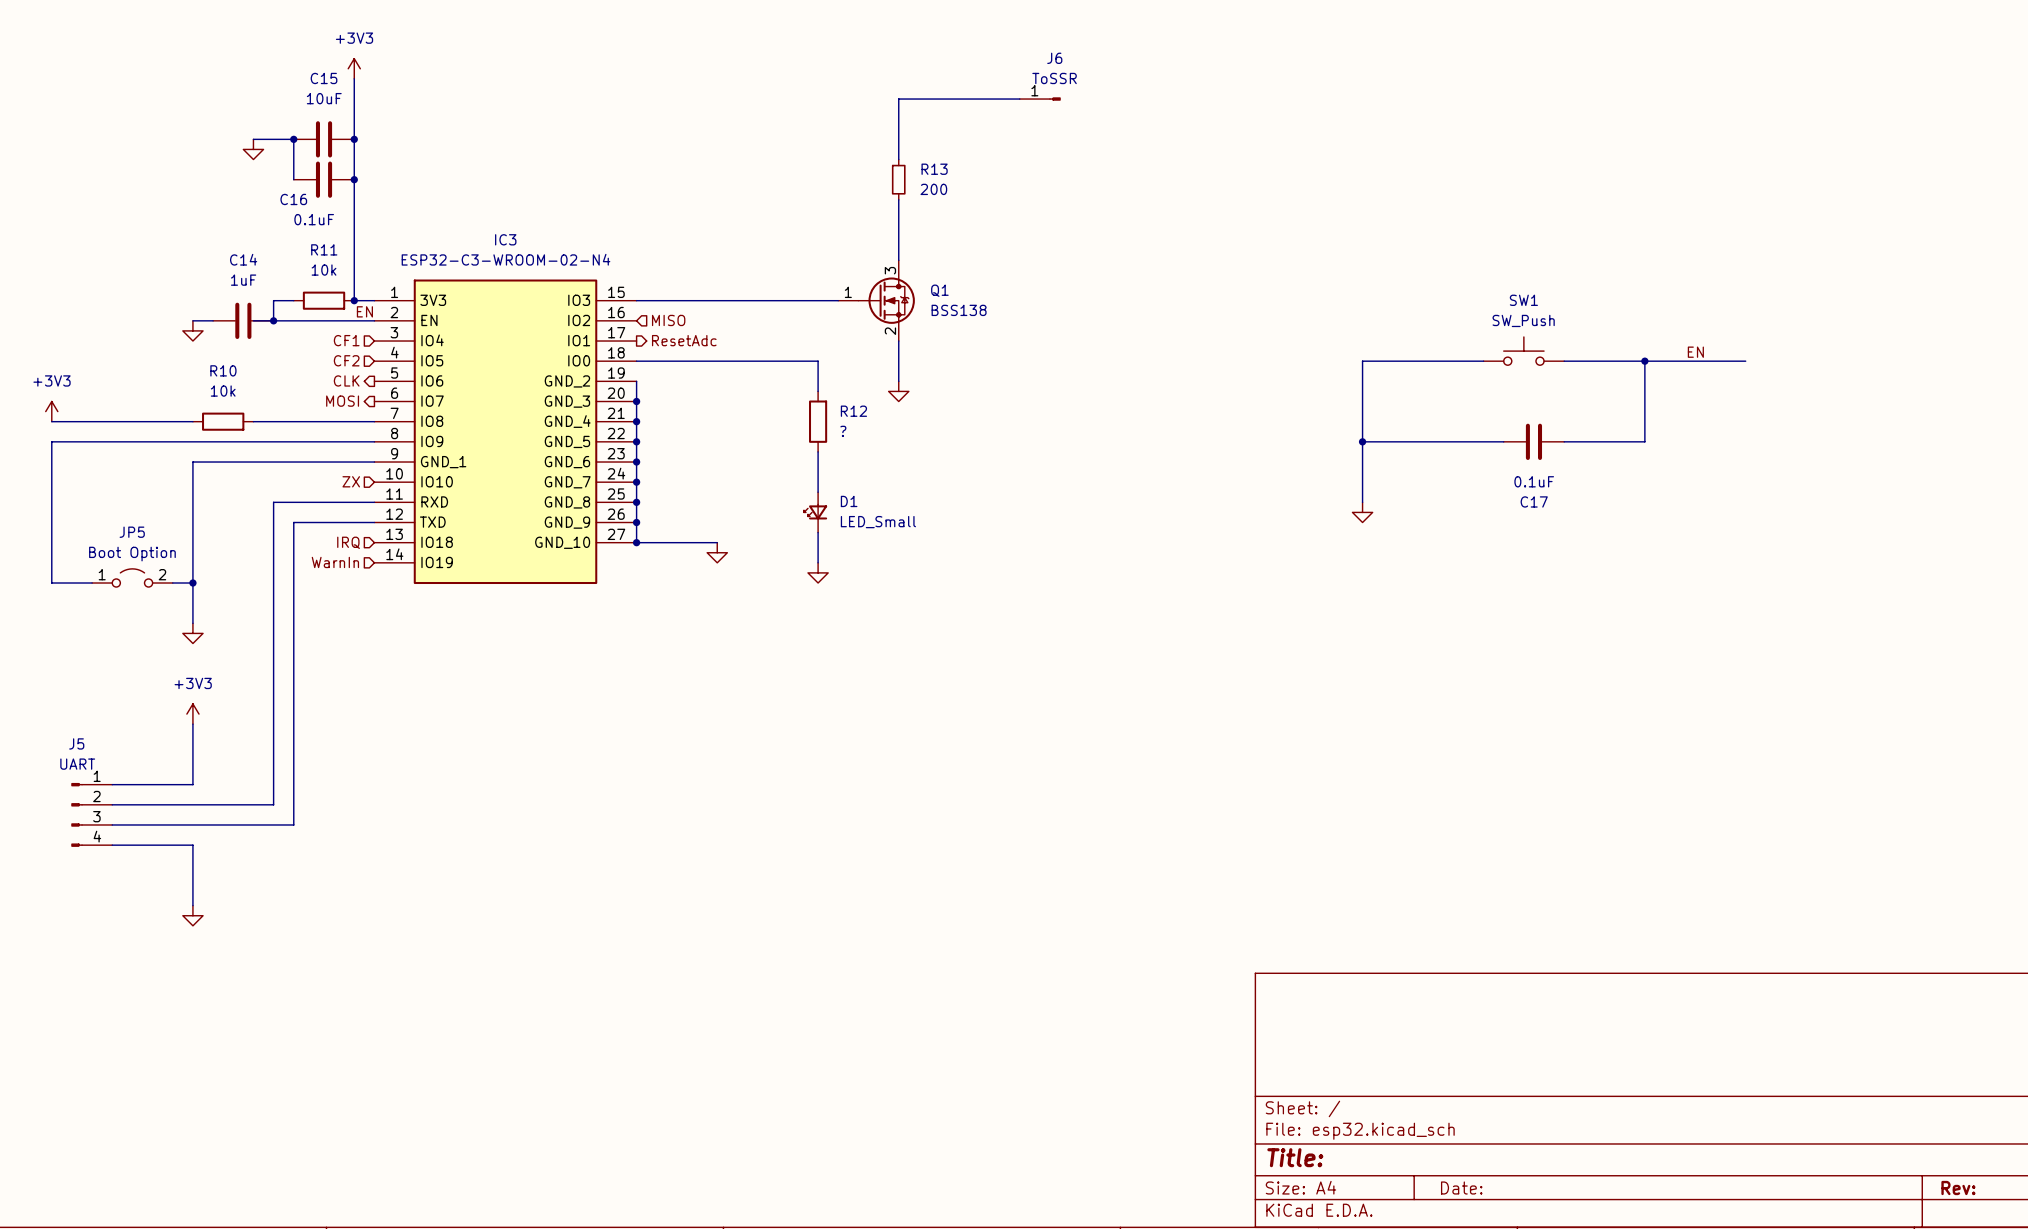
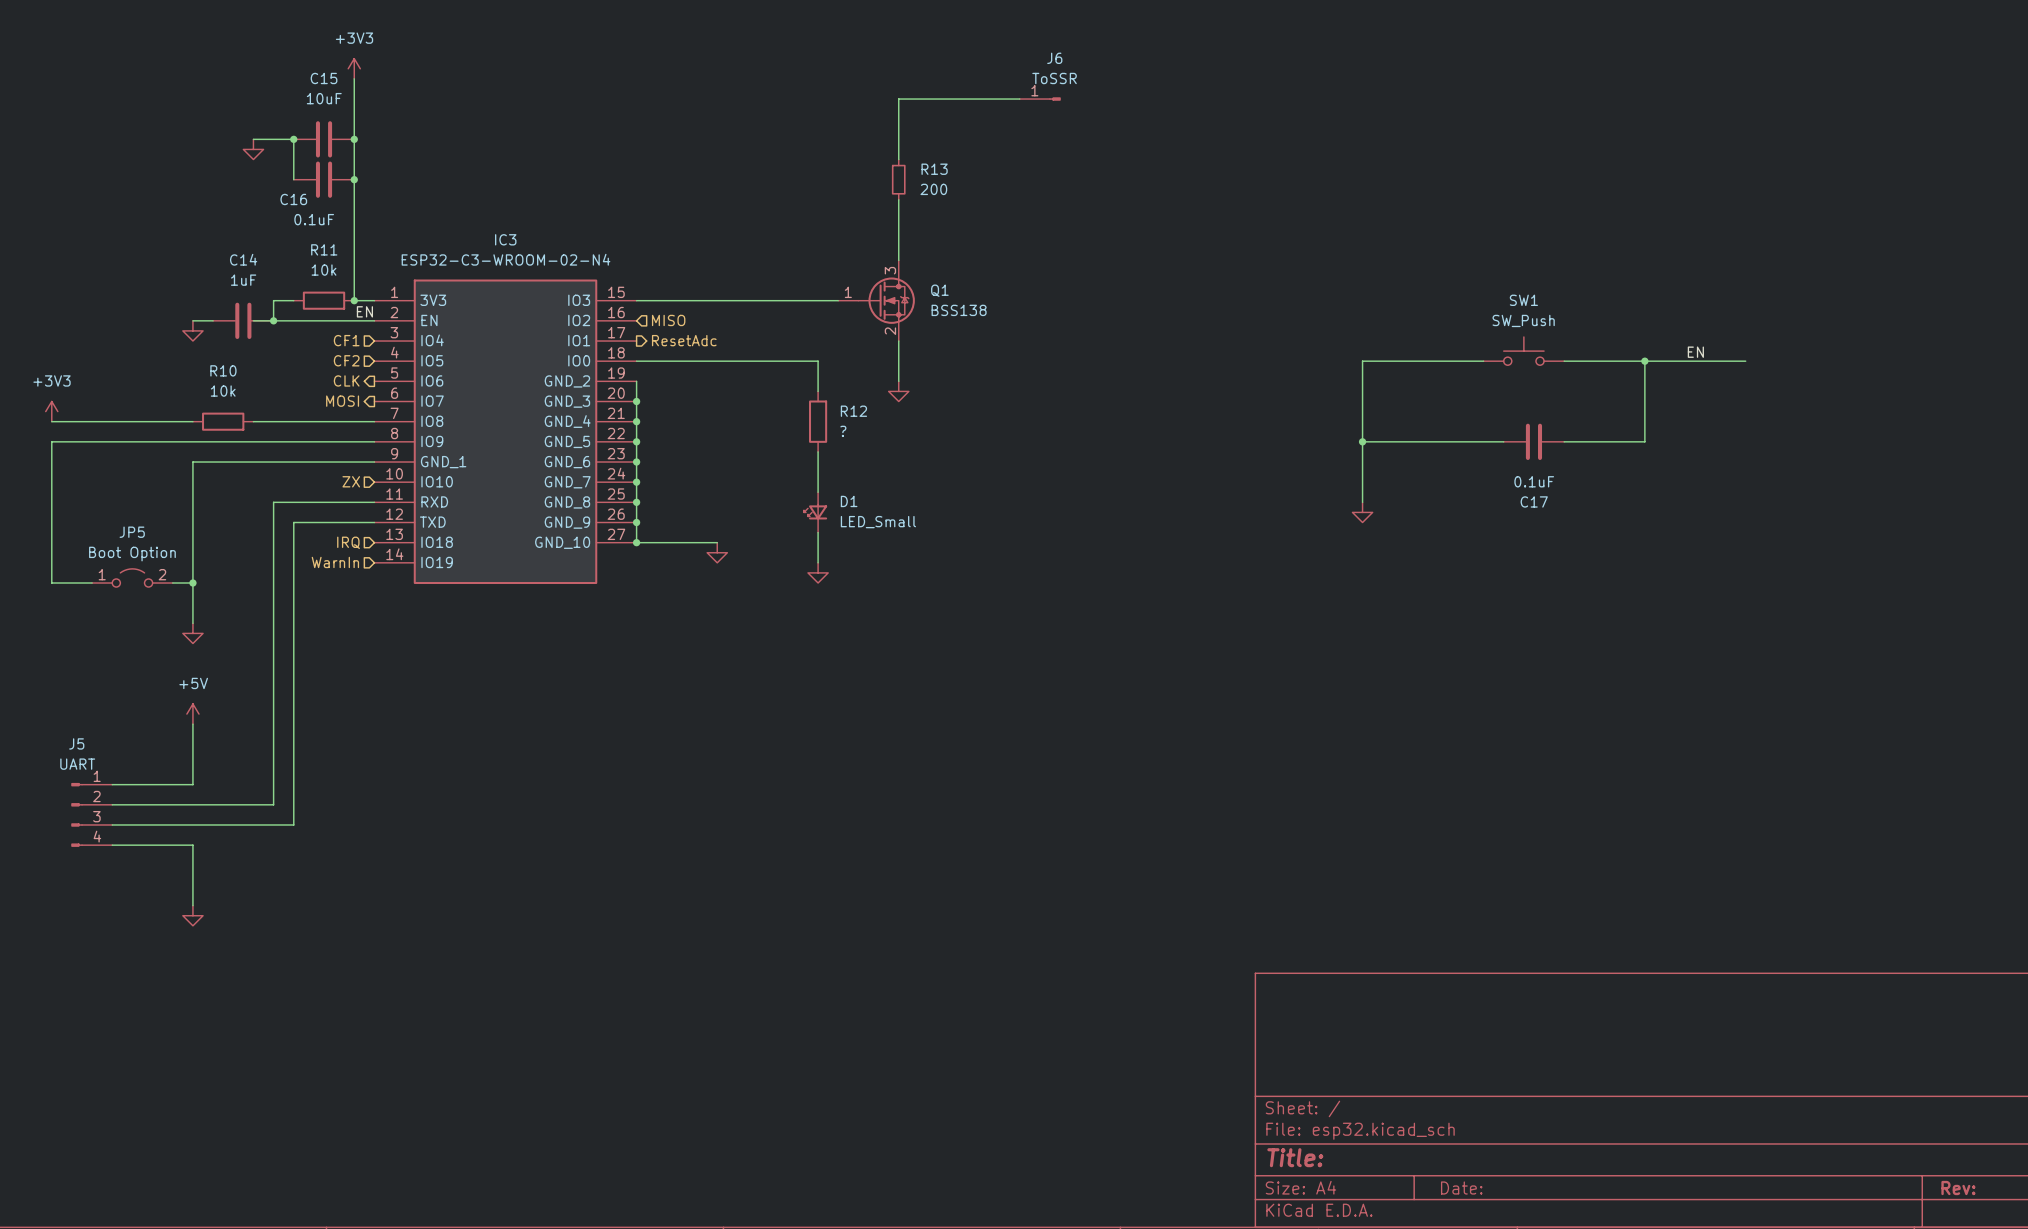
power symbol: +3V3 (192, 714) -> +5V (192, 714)

